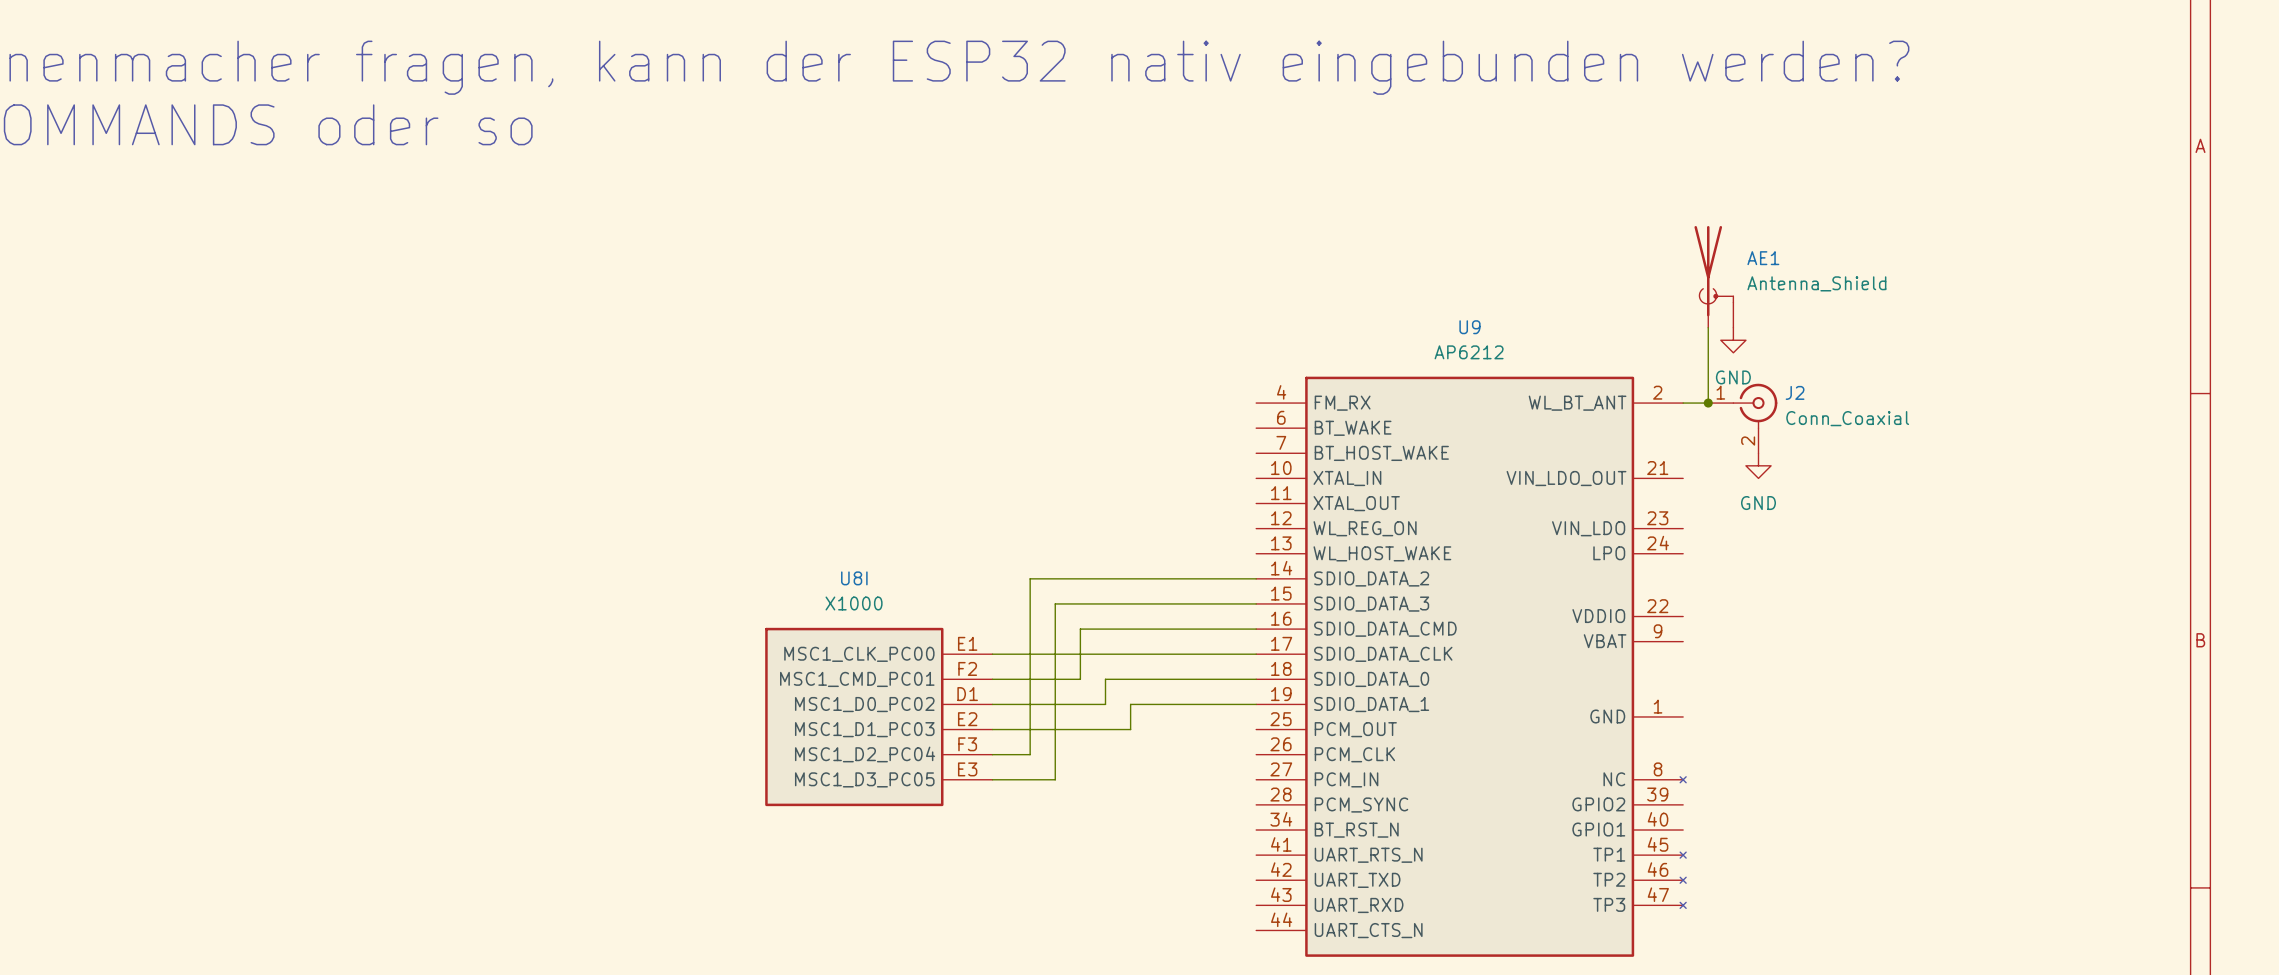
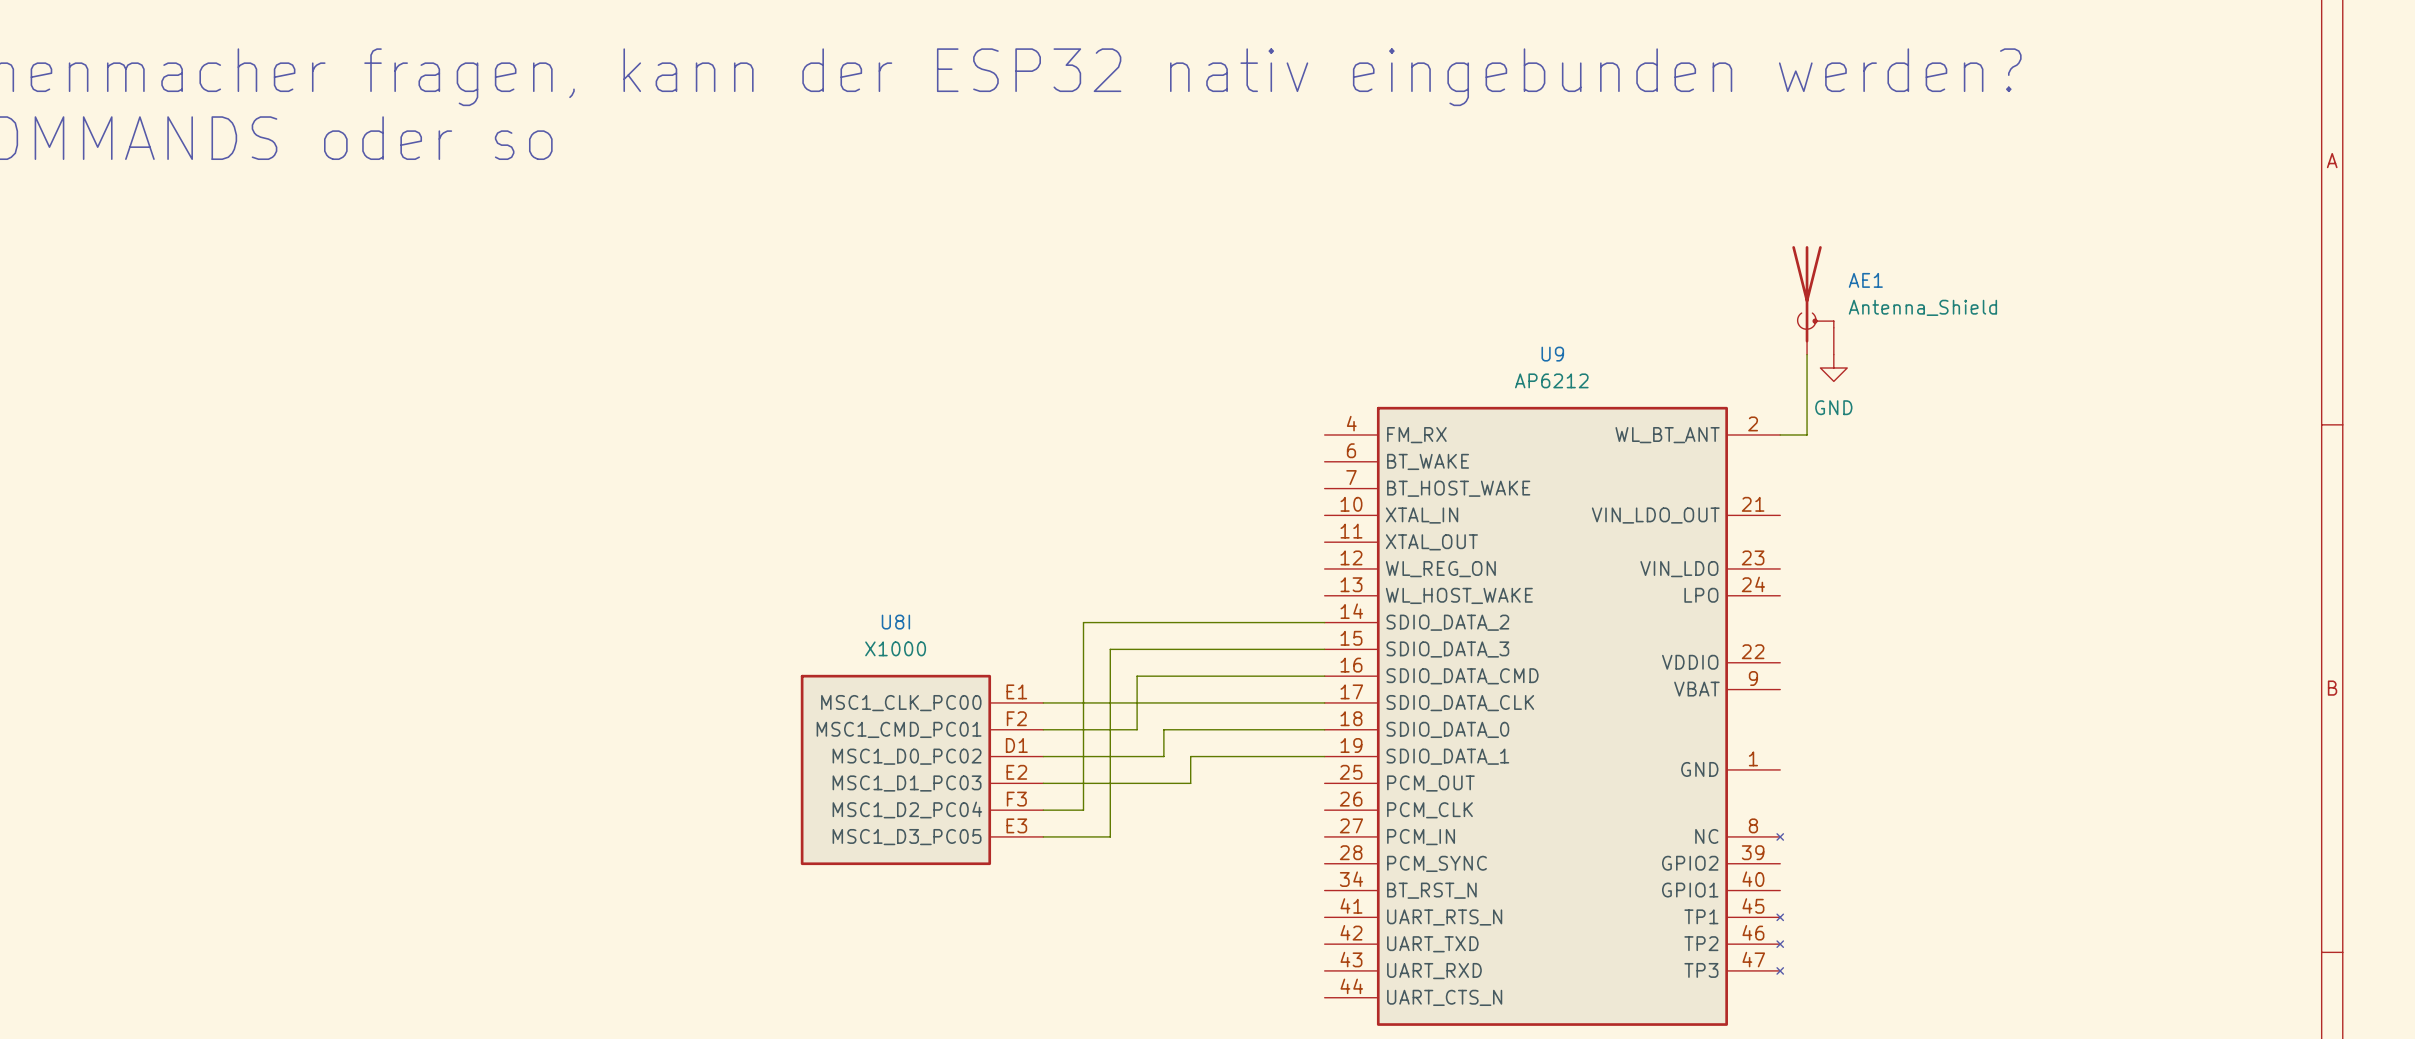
junction: (1708, 403) -> none
J2: Conn_Coaxial (1742, 418) -> none
power symbol: GND (1758, 465) -> none

